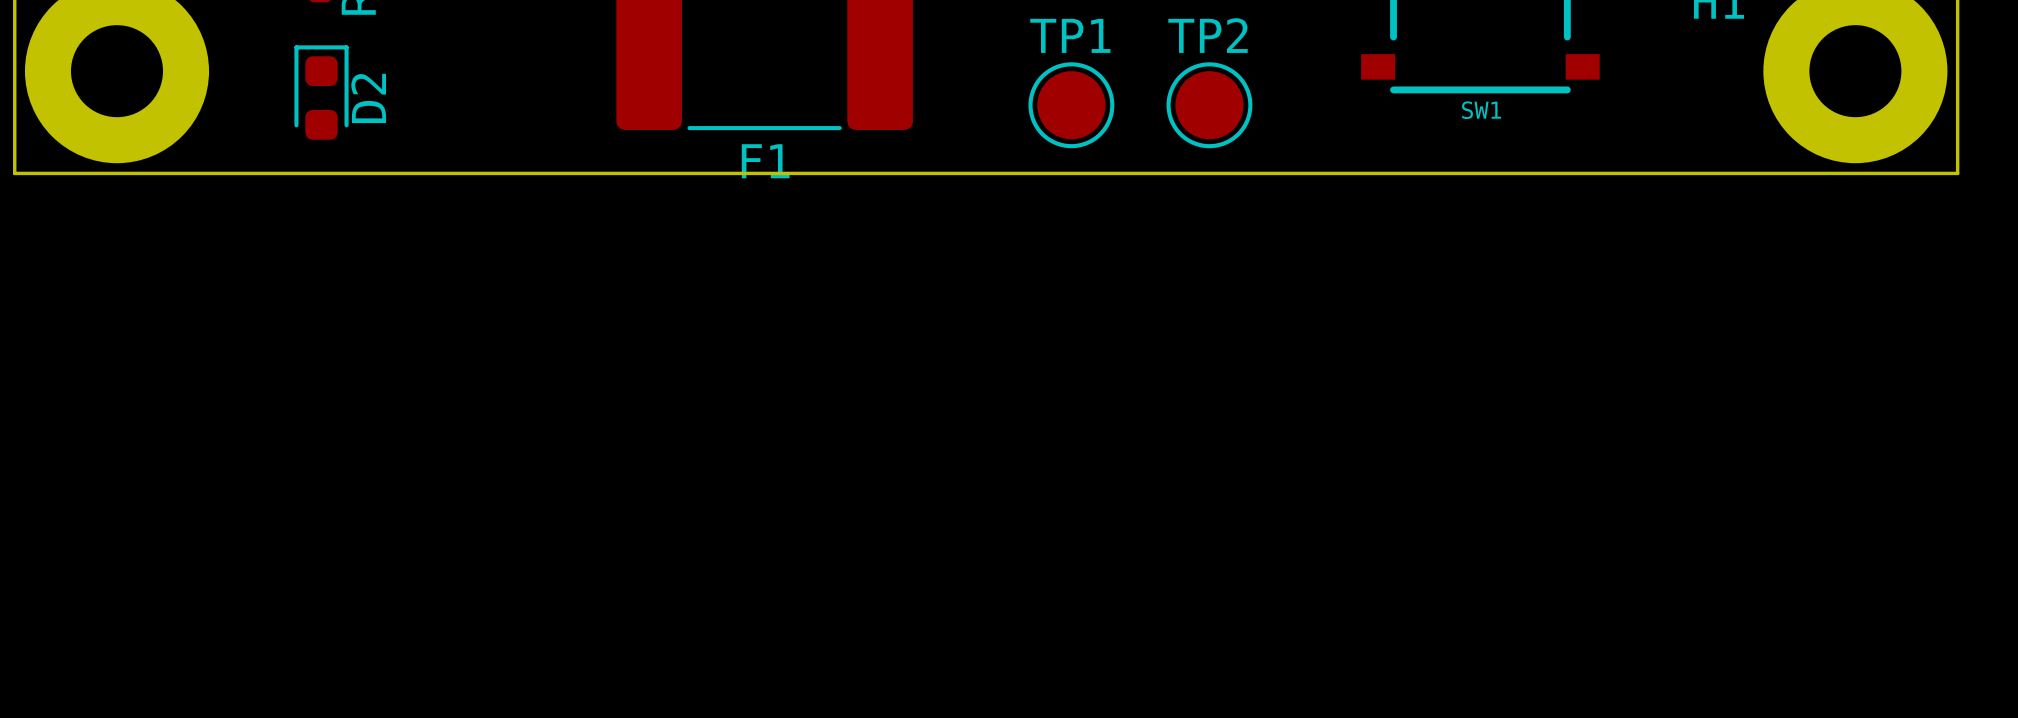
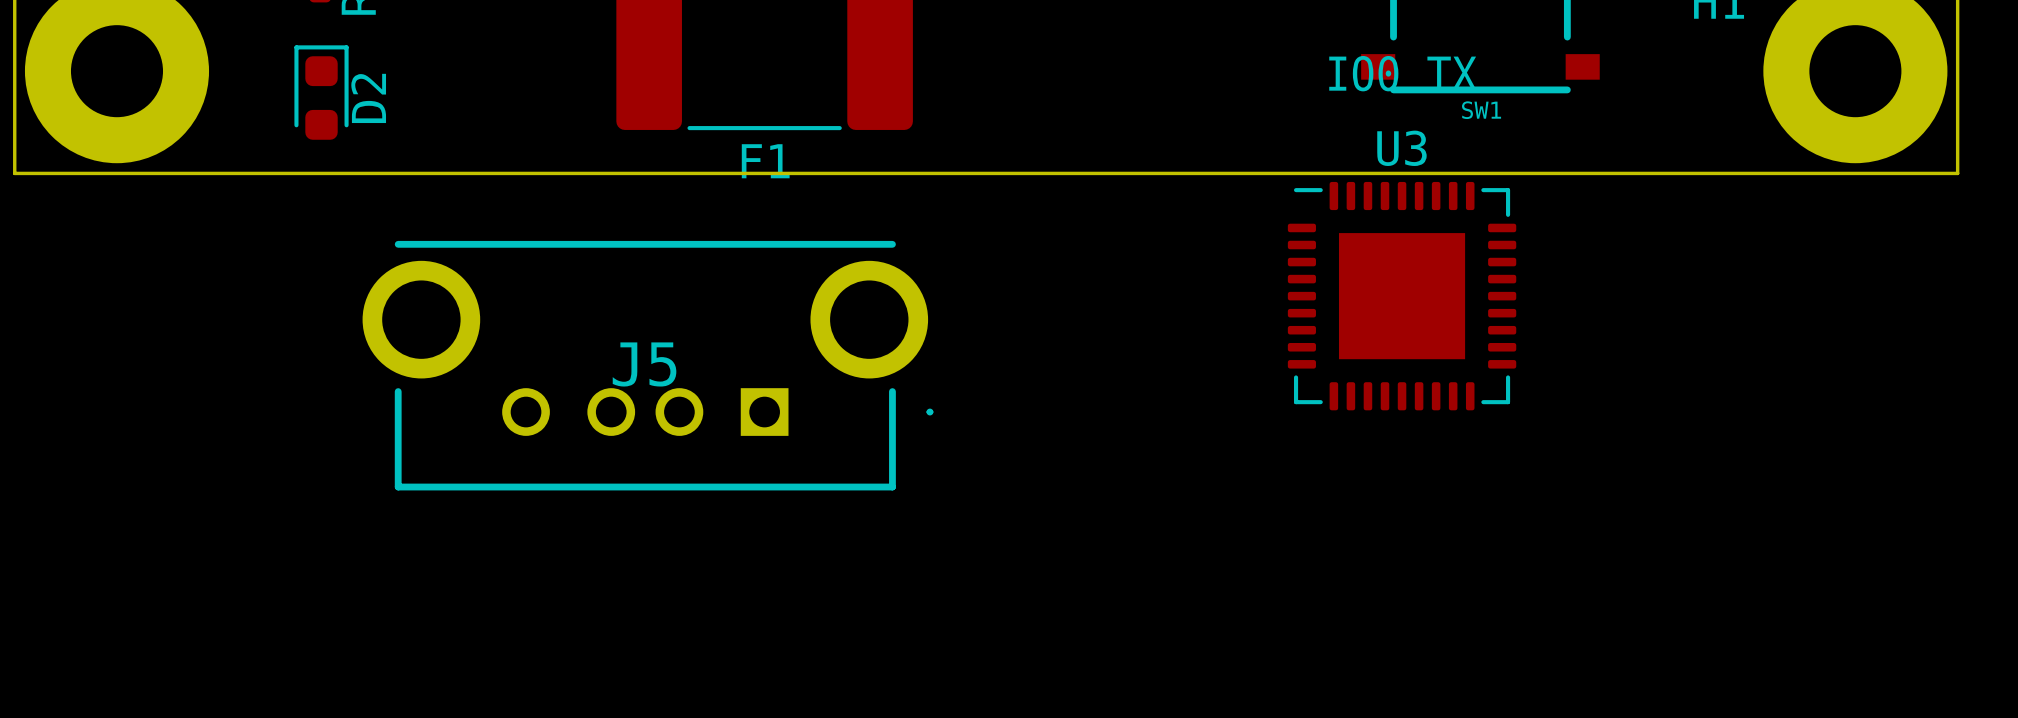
text: none -> IO0 TX (1402, 73)
TP1: (1071, 105) -> none
TP2: (1209, 105) -> none
U3: none -> (1402, 296)
J5: none -> (647, 365)

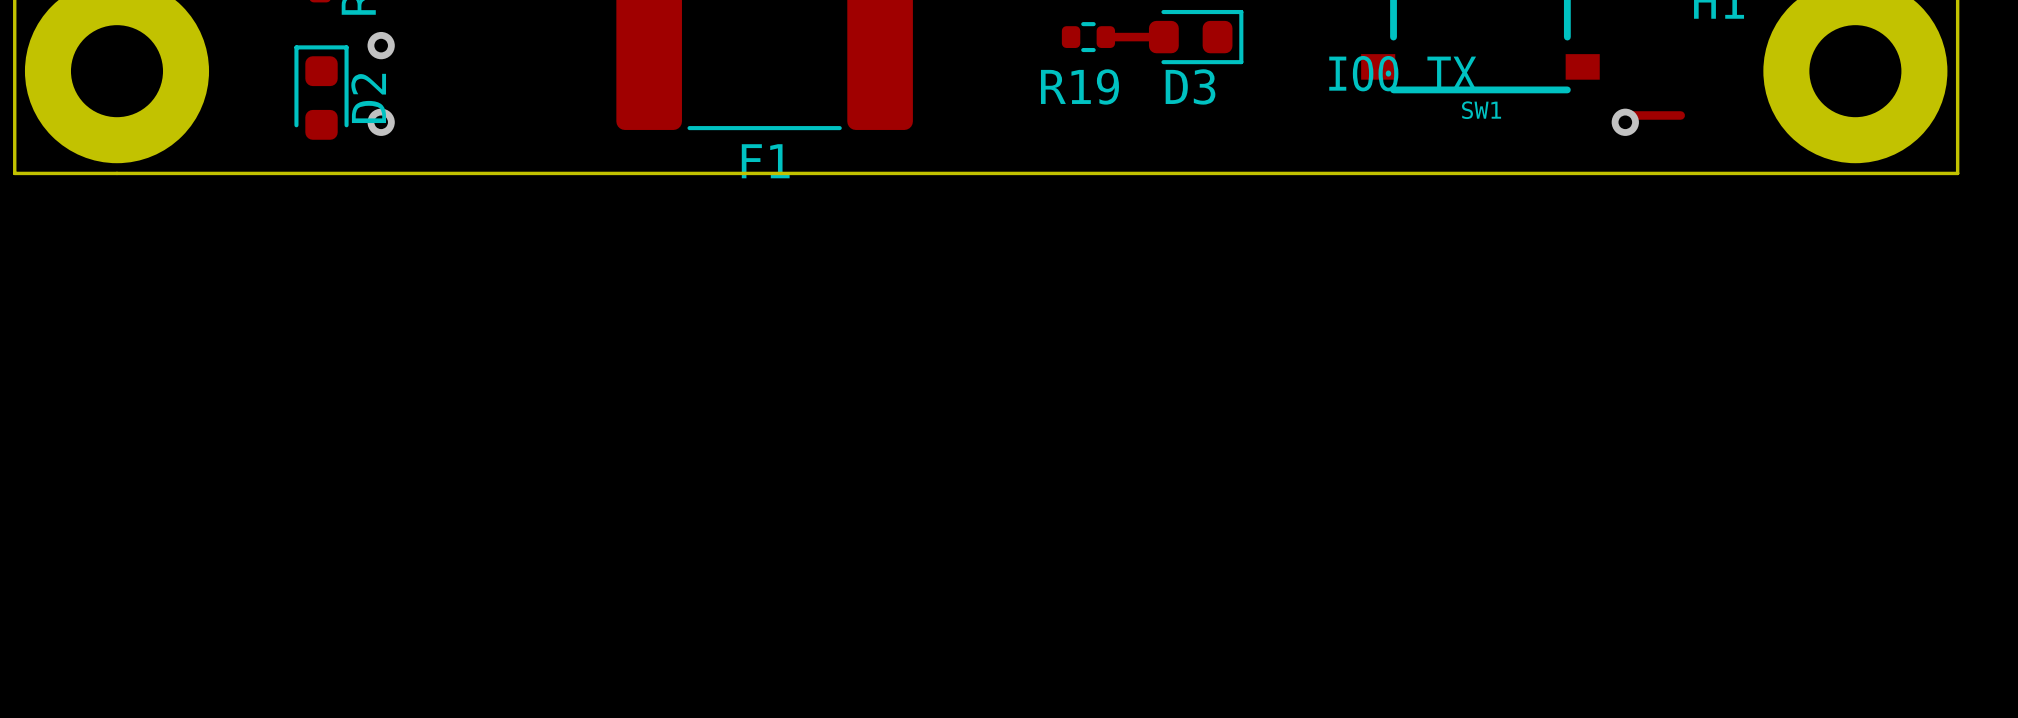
R19: none -> (1088, 37)
track: none -> (1105, 37) (1163, 37)
D3: none -> (1196, 37)
via: none -> (381, 45)
track: none -> (1680, 115) (1632, 115) (1625, 122)
via: none -> (381, 122)
via: none -> (1625, 122)
U3: (1402, 296) -> none
J5: (647, 365) -> none

